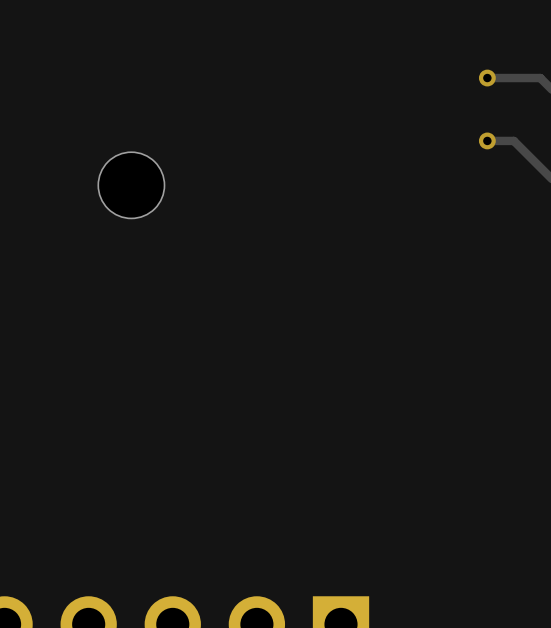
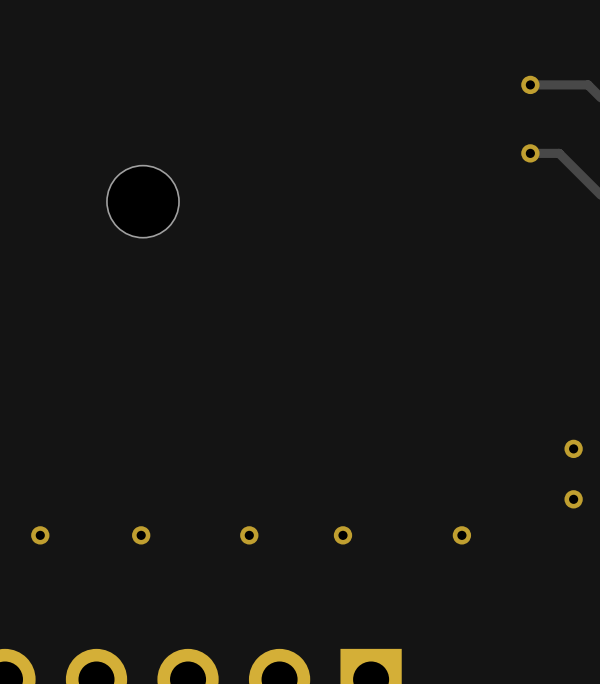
via: none -> (573, 448)
via: none -> (573, 499)
via: none -> (40, 535)
via: none -> (141, 535)
via: none -> (249, 535)
via: none -> (342, 535)
via: none -> (461, 535)

